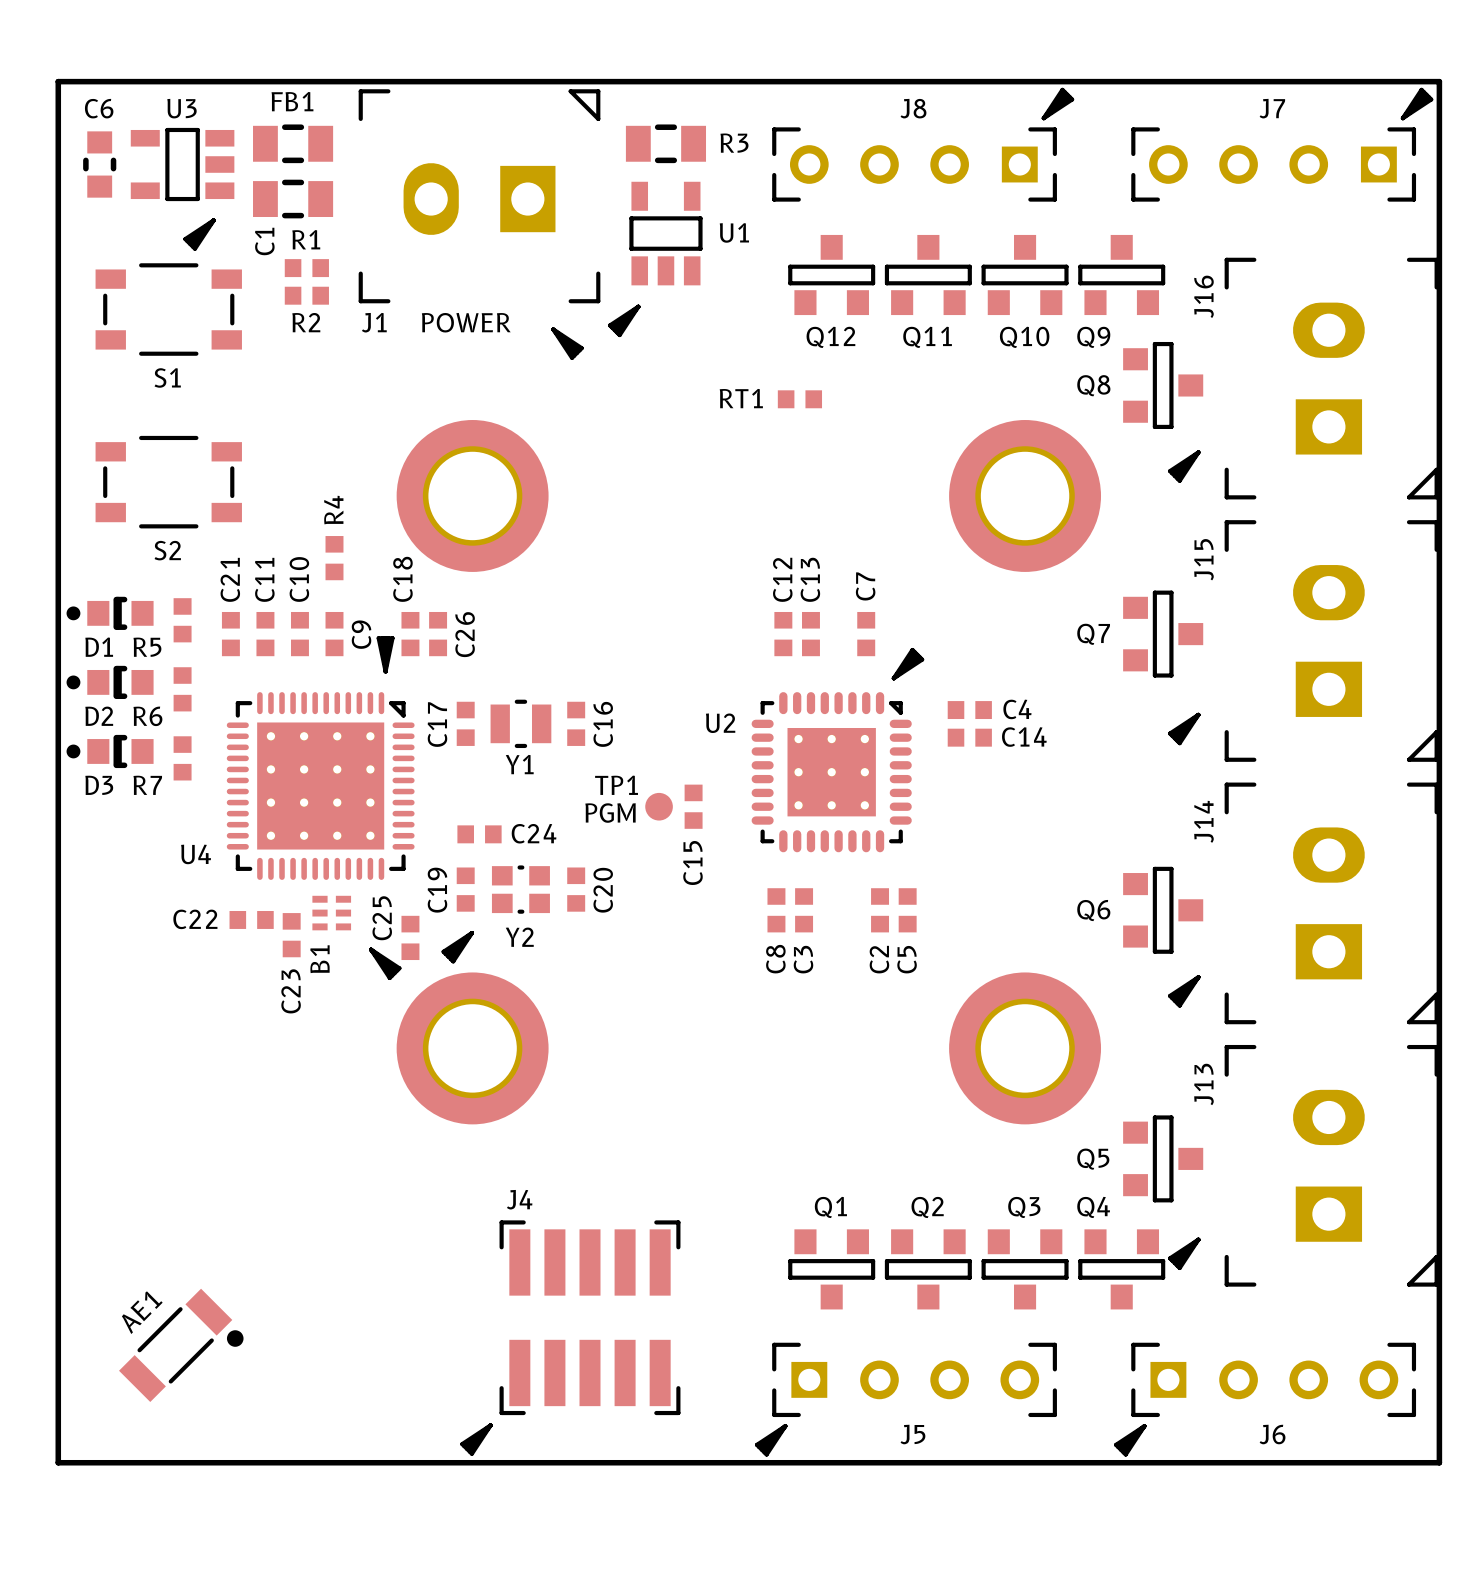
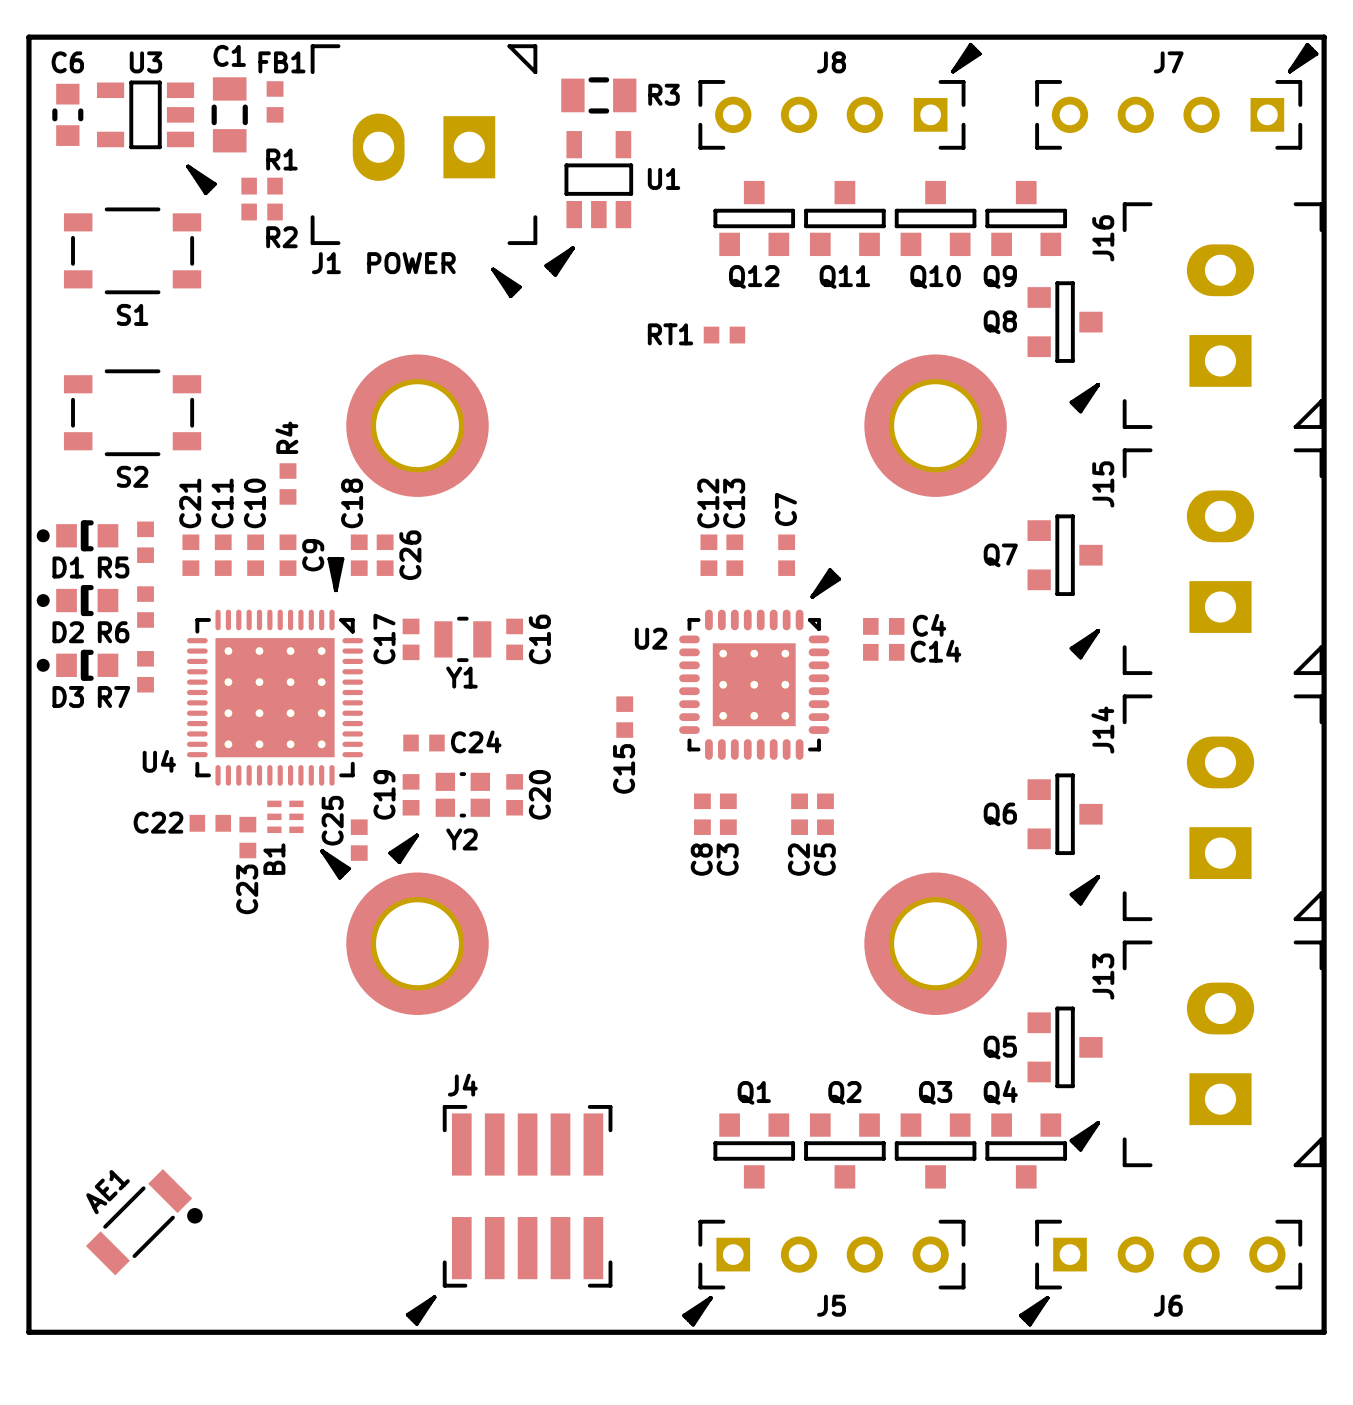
FB1 footprint: [253, 124, 334, 164] -> [266, 81, 284, 123]
U3 footprint: [130, 127, 235, 251] -> [96, 80, 217, 196]
C1 rotation: 0° (293, 199) -> 90° clockwise (229, 114)
R1 name: R1 (306, 239) -> R2 (281, 237)
R1: none -> (262, 186)
R2: (306, 295) -> none
TP1: PGM (659, 806) -> none

